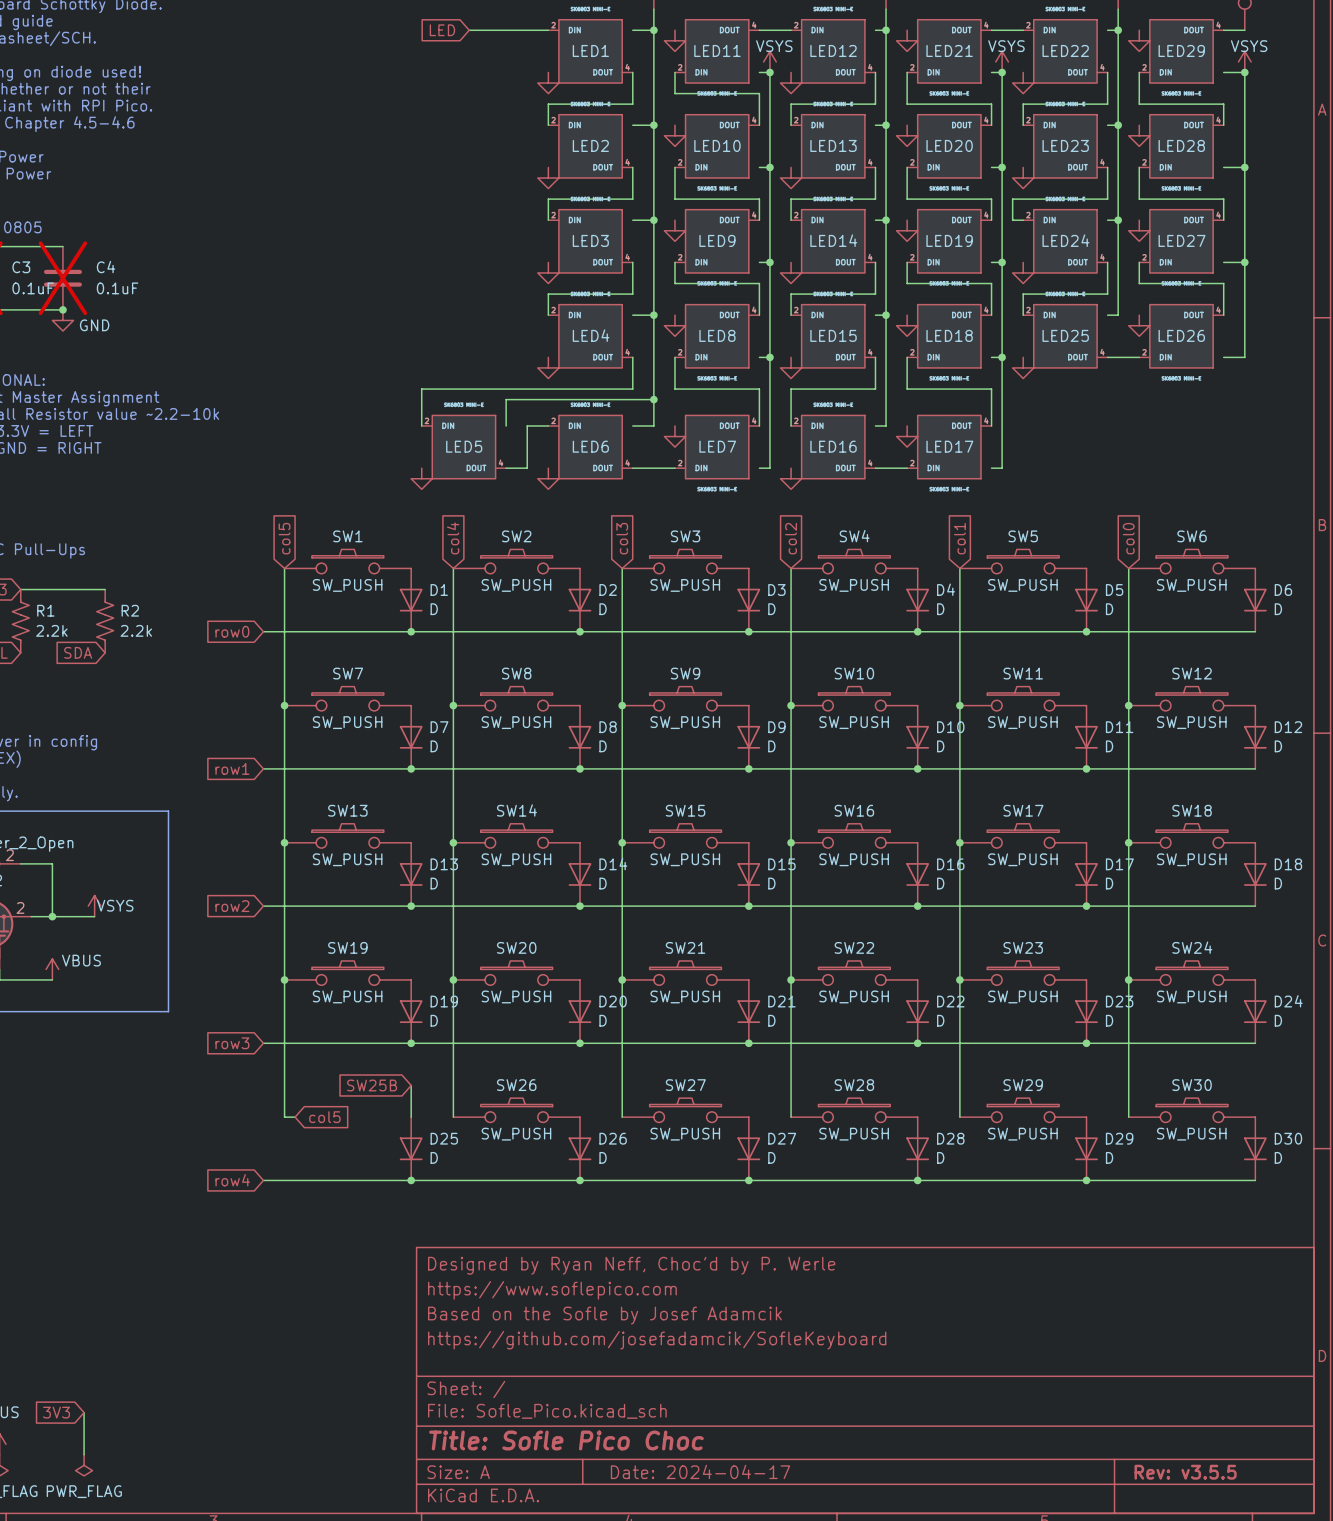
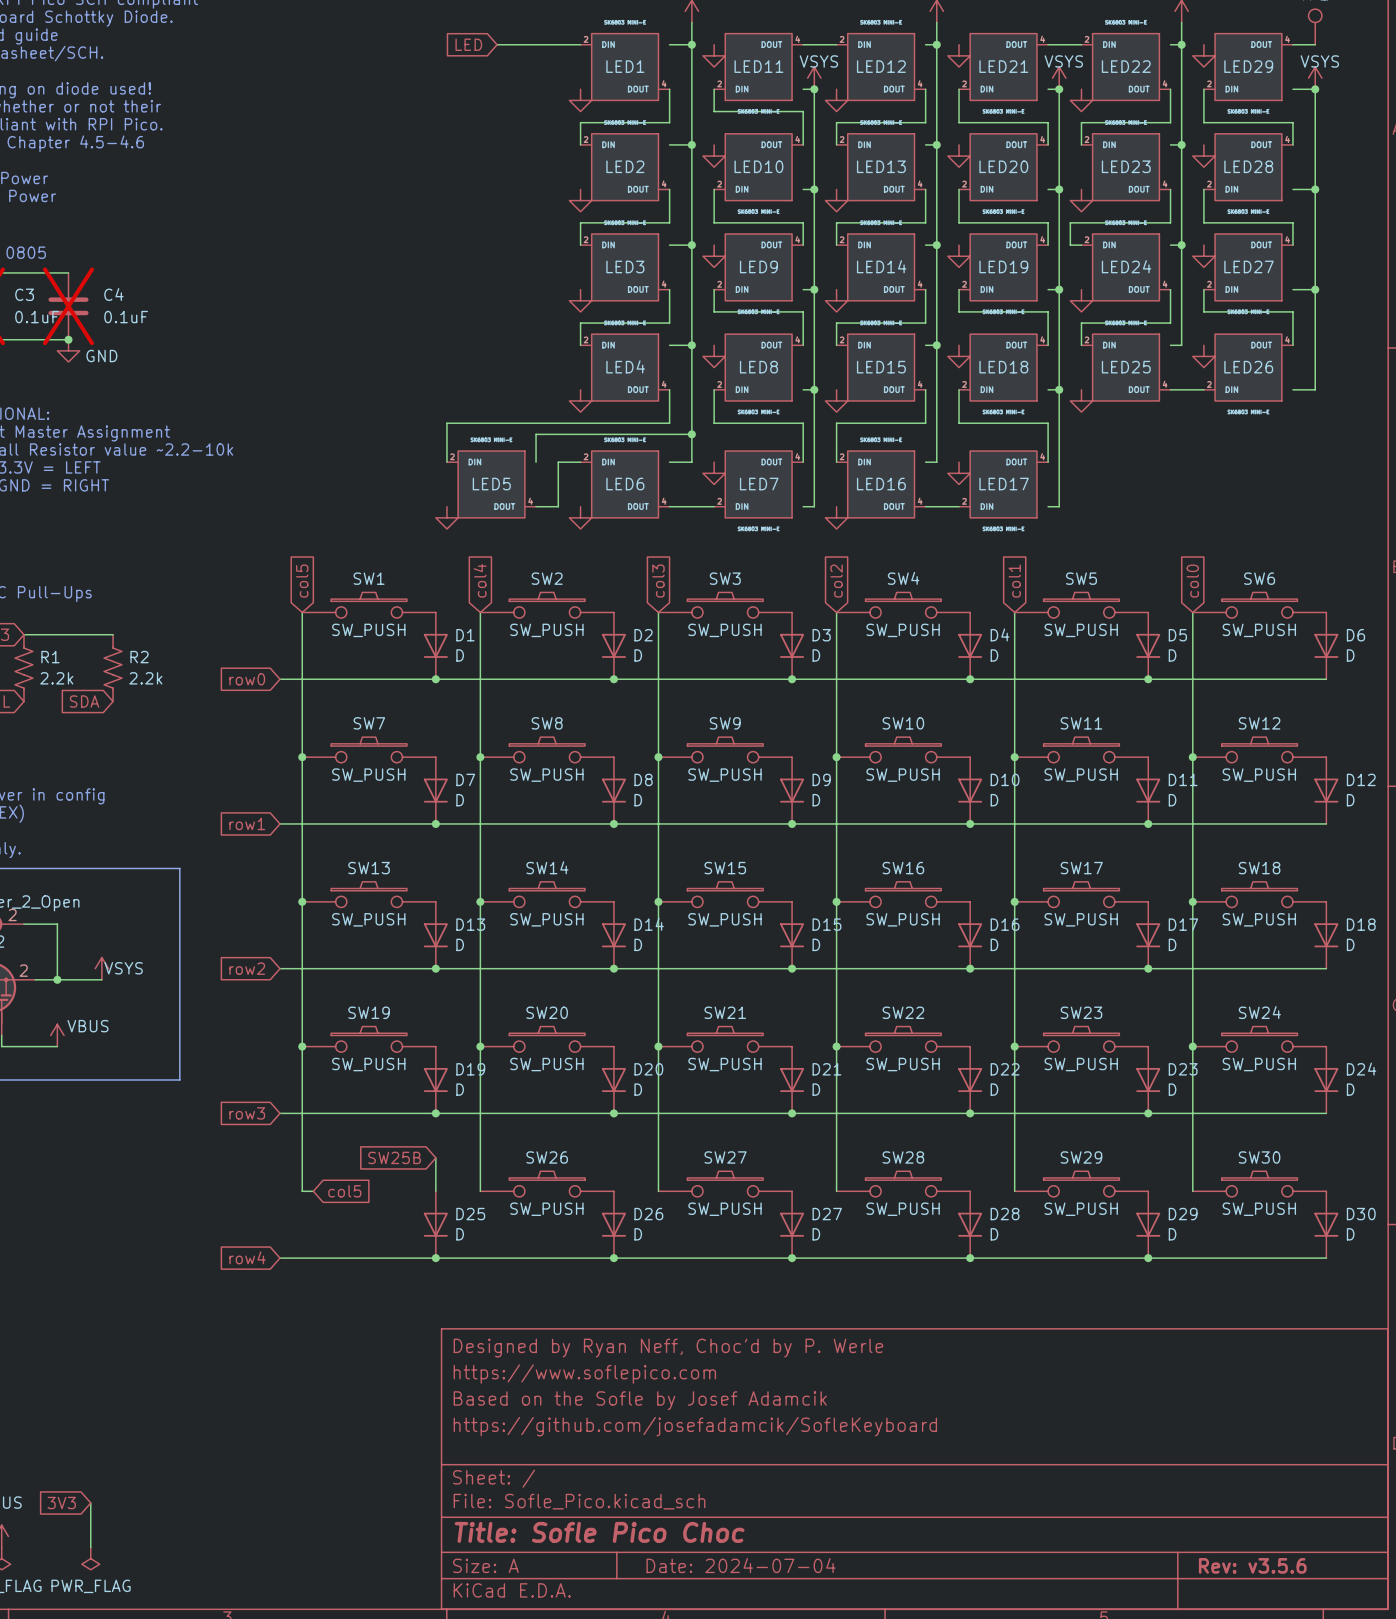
title block: Date: 2024-04-17 (700, 1471) -> Date: 2024-07-04 (741, 1565)
title block: Rev: v3.5.5 (1185, 1472) -> Rev: v3.5.6 (1252, 1565)

